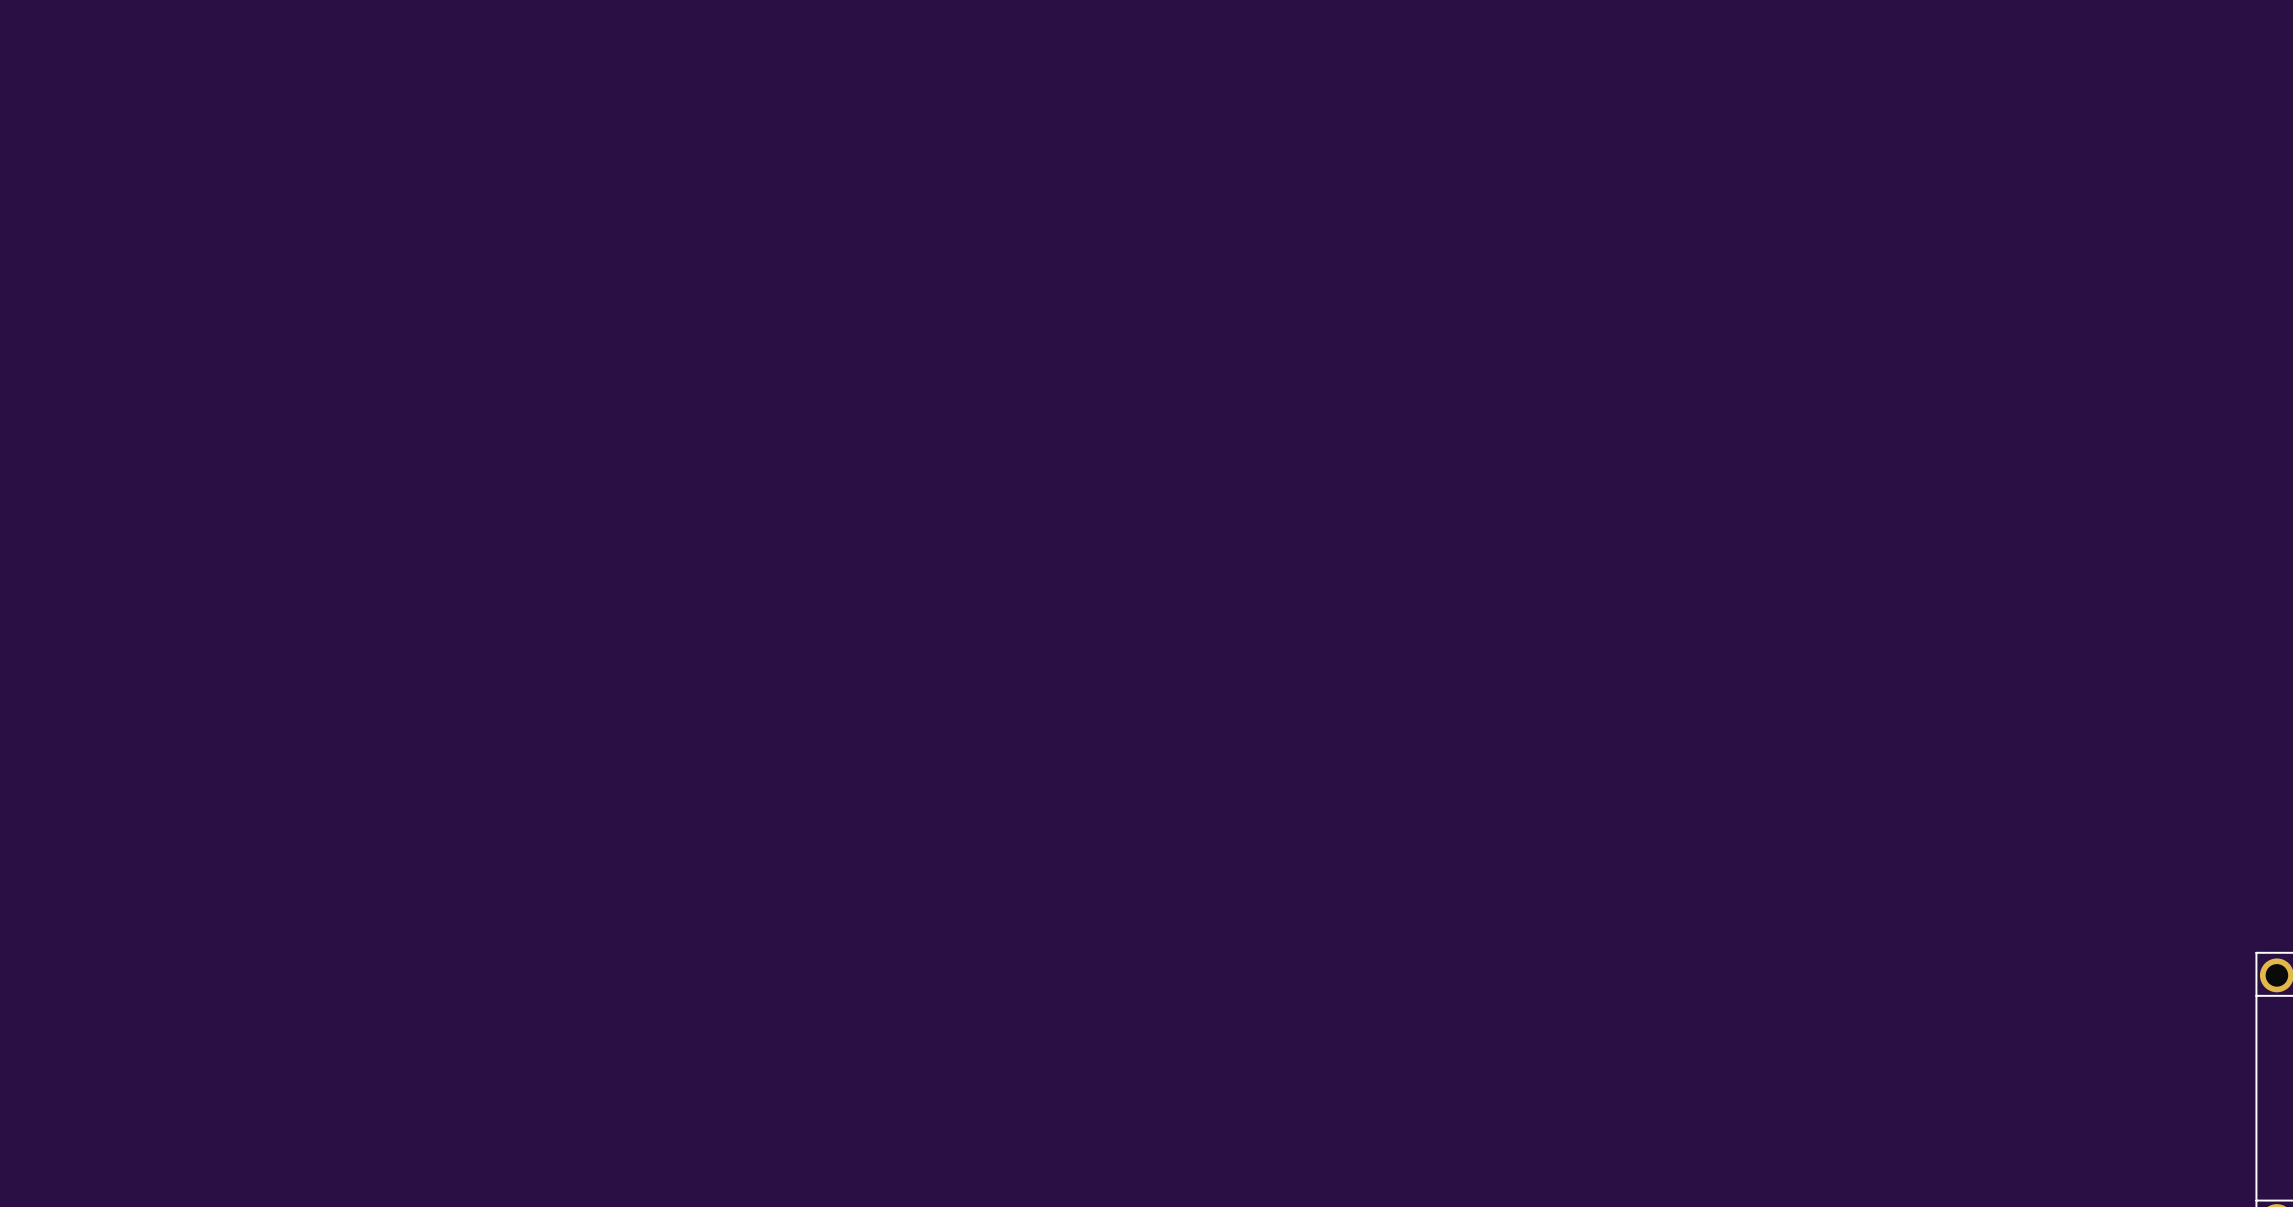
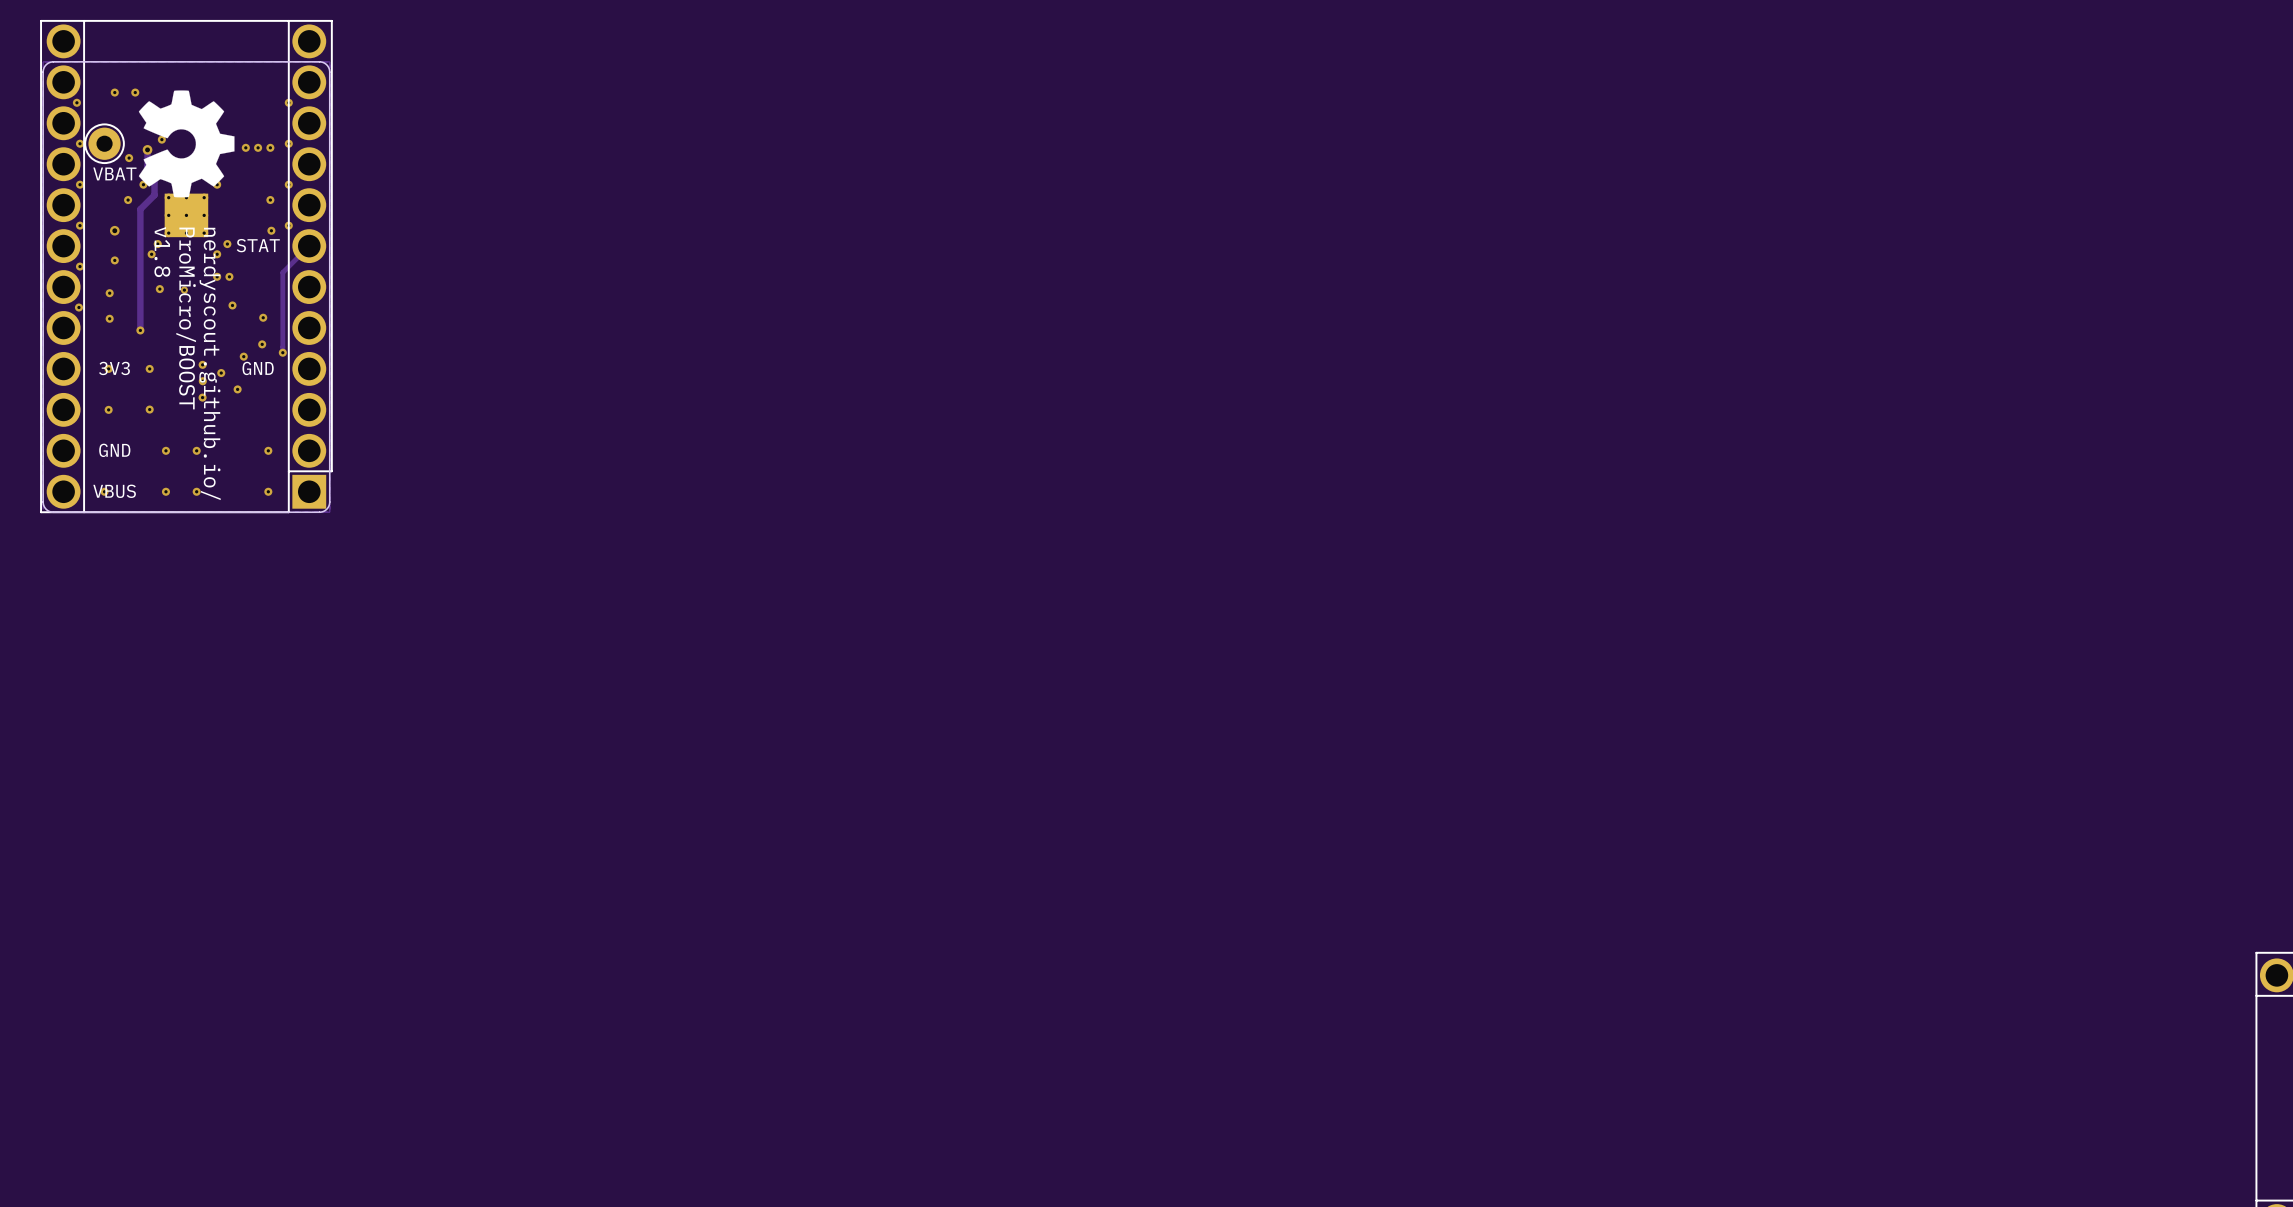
board edge: none -> (319, 61) (53, 61) (44, 66) (43, 72) (43, 502) (47, 510) (53, 512) (319, 512) (328, 507) (329, 502) (329, 72) (326, 64) (319, 61)
drawing: none -> [138, 90, 235, 198]
via: none -> (114, 92)
via: none -> (135, 92)
via: none -> (76, 102)
via: none -> (288, 102)
via: none -> (161, 139)
via: none -> (79, 143)
part: none -> VBAT (104, 143)
via: none -> (288, 143)
via: none -> (245, 147)
via: none -> (258, 147)
via: none -> (270, 147)
track: none -> (147, 149) (147, 166) (154, 173) (154, 195) (140, 209) (140, 330)
via: none -> (147, 149)
via: none -> (129, 158)
via: none -> (79, 184)
via: none -> (143, 184)
via: none -> (217, 184)
via: none -> (288, 184)
via: none -> (128, 200)
via: none -> (270, 200)
part: none -> (186, 215)
via: none -> (79, 225)
via: none -> (288, 225)
via: none -> (114, 230)
via: none -> (271, 230)
via: none -> (157, 244)
via: none -> (227, 244)
text: none -> STAT (258, 245)
track: none -> (309, 246) (282, 272) (282, 352)
text: none -> v1.8 (162, 252)
via: none -> (151, 254)
via: none -> (217, 254)
via: none -> (114, 260)
via: none -> (79, 266)
part: none -> (186, 266)
via: none -> (217, 276)
via: none -> (229, 276)
via: none -> (159, 289)
via: none -> (184, 290)
via: none -> (109, 293)
via: none -> (232, 305)
via: none -> (78, 307)
via: none -> (263, 317)
via: none -> (109, 318)
text: none -> ProMicro/BOOST (186, 318)
via: none -> (140, 330)
via: none -> (262, 344)
via: none -> (282, 352)
via: none -> (243, 356)
text: none -> nerdyscout.github.io/ (210, 363)
via: none -> (202, 364)
via: none -> (108, 368)
text: none -> 3V3 (114, 368)
via: none -> (149, 368)
text: none -> GND (258, 368)
via: none -> (221, 373)
via: none -> (202, 381)
via: none -> (237, 389)
via: none -> (202, 397)
via: none -> (108, 409)
via: none -> (149, 409)
text: none -> GND (114, 450)
via: none -> (165, 450)
via: none -> (196, 450)
via: none -> (268, 450)
via: none -> (104, 491)
text: none -> VBUS (114, 491)
via: none -> (165, 491)
via: none -> (196, 491)
via: none -> (268, 491)

